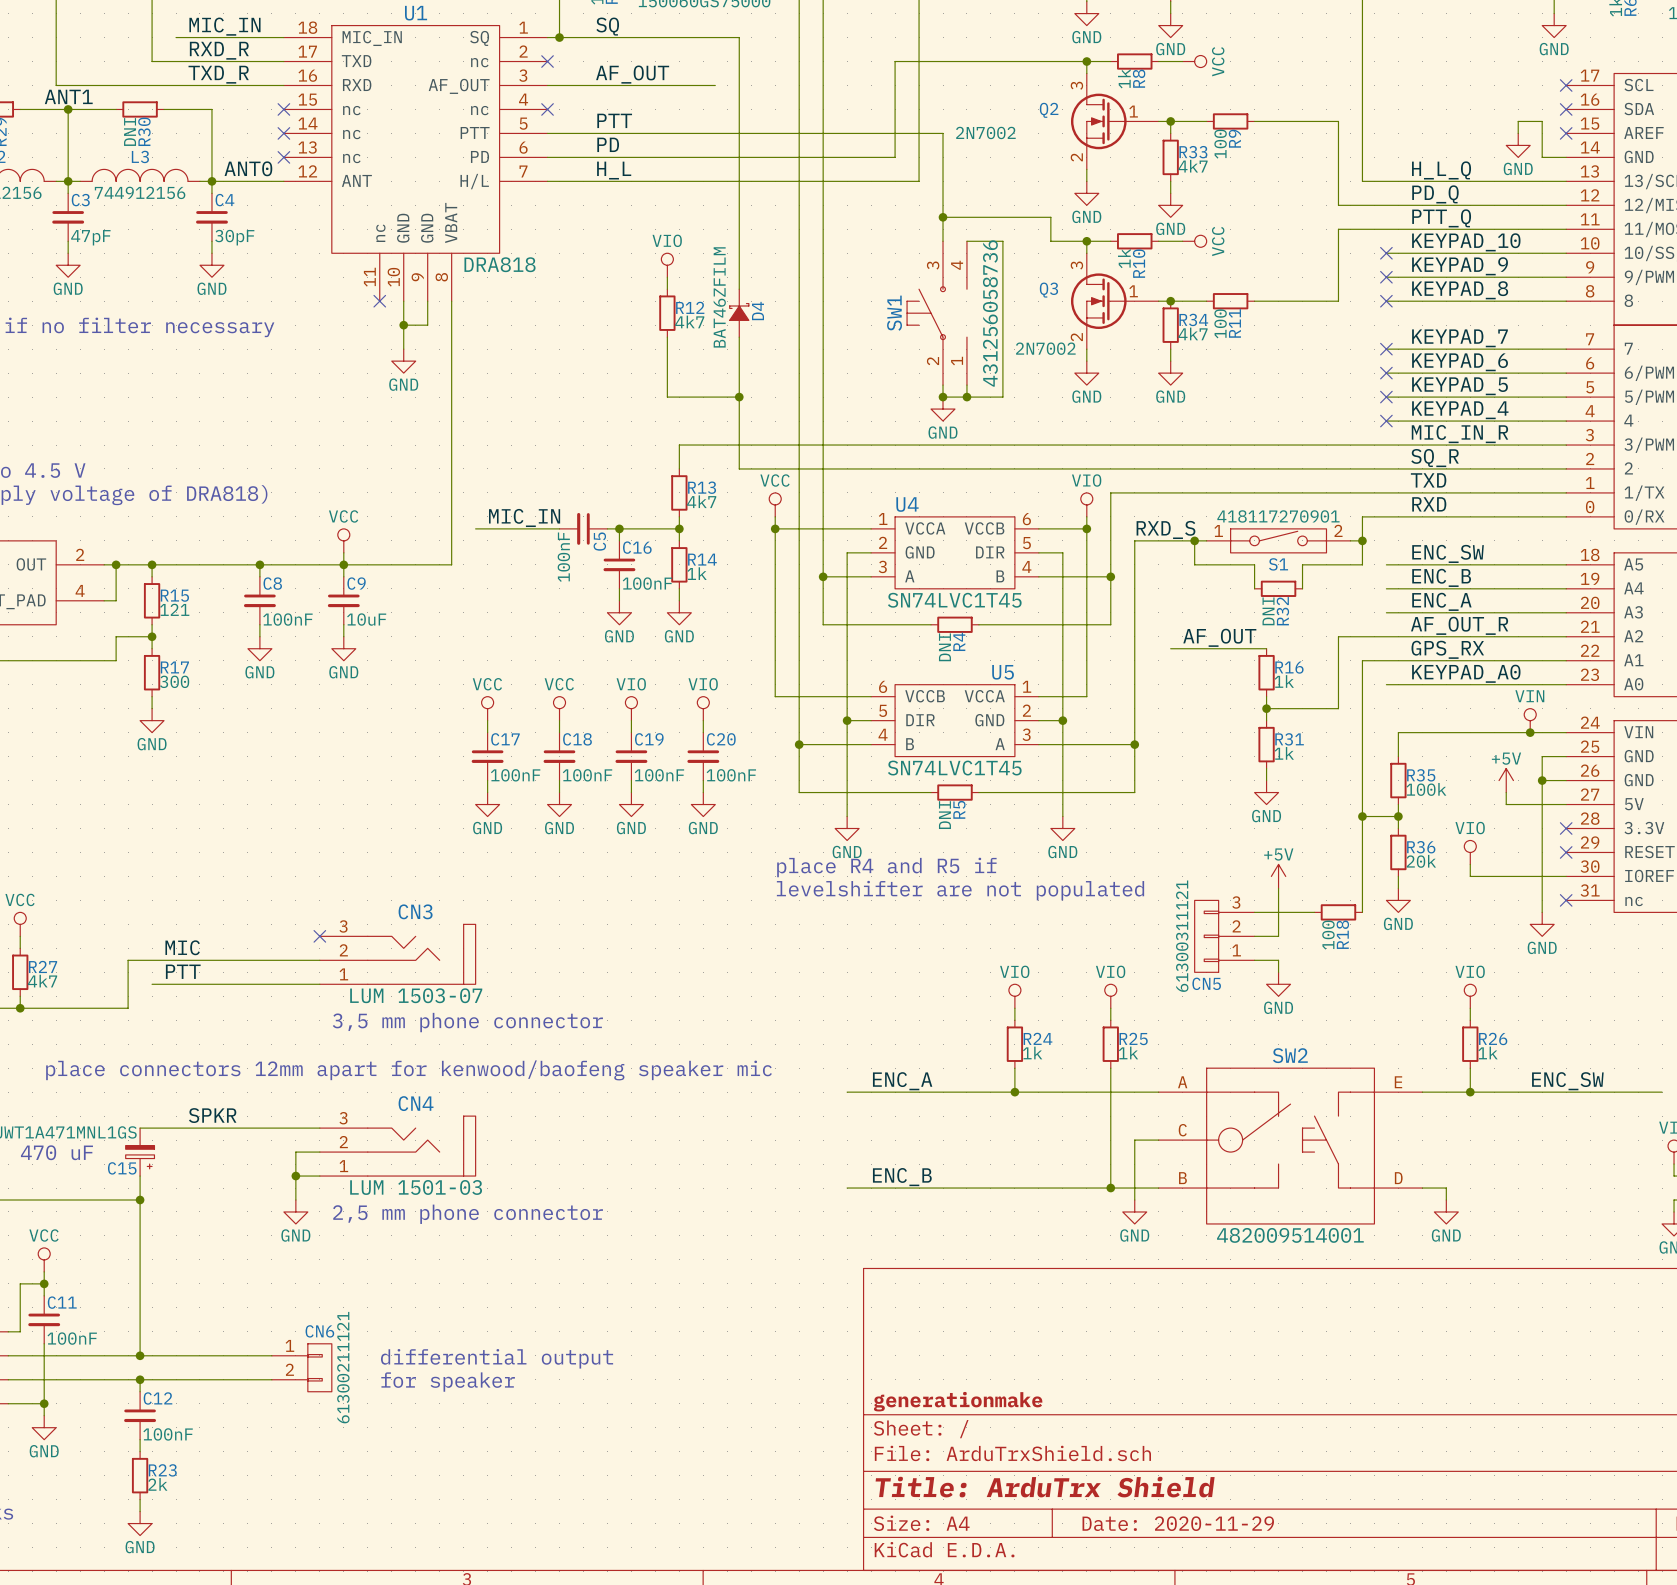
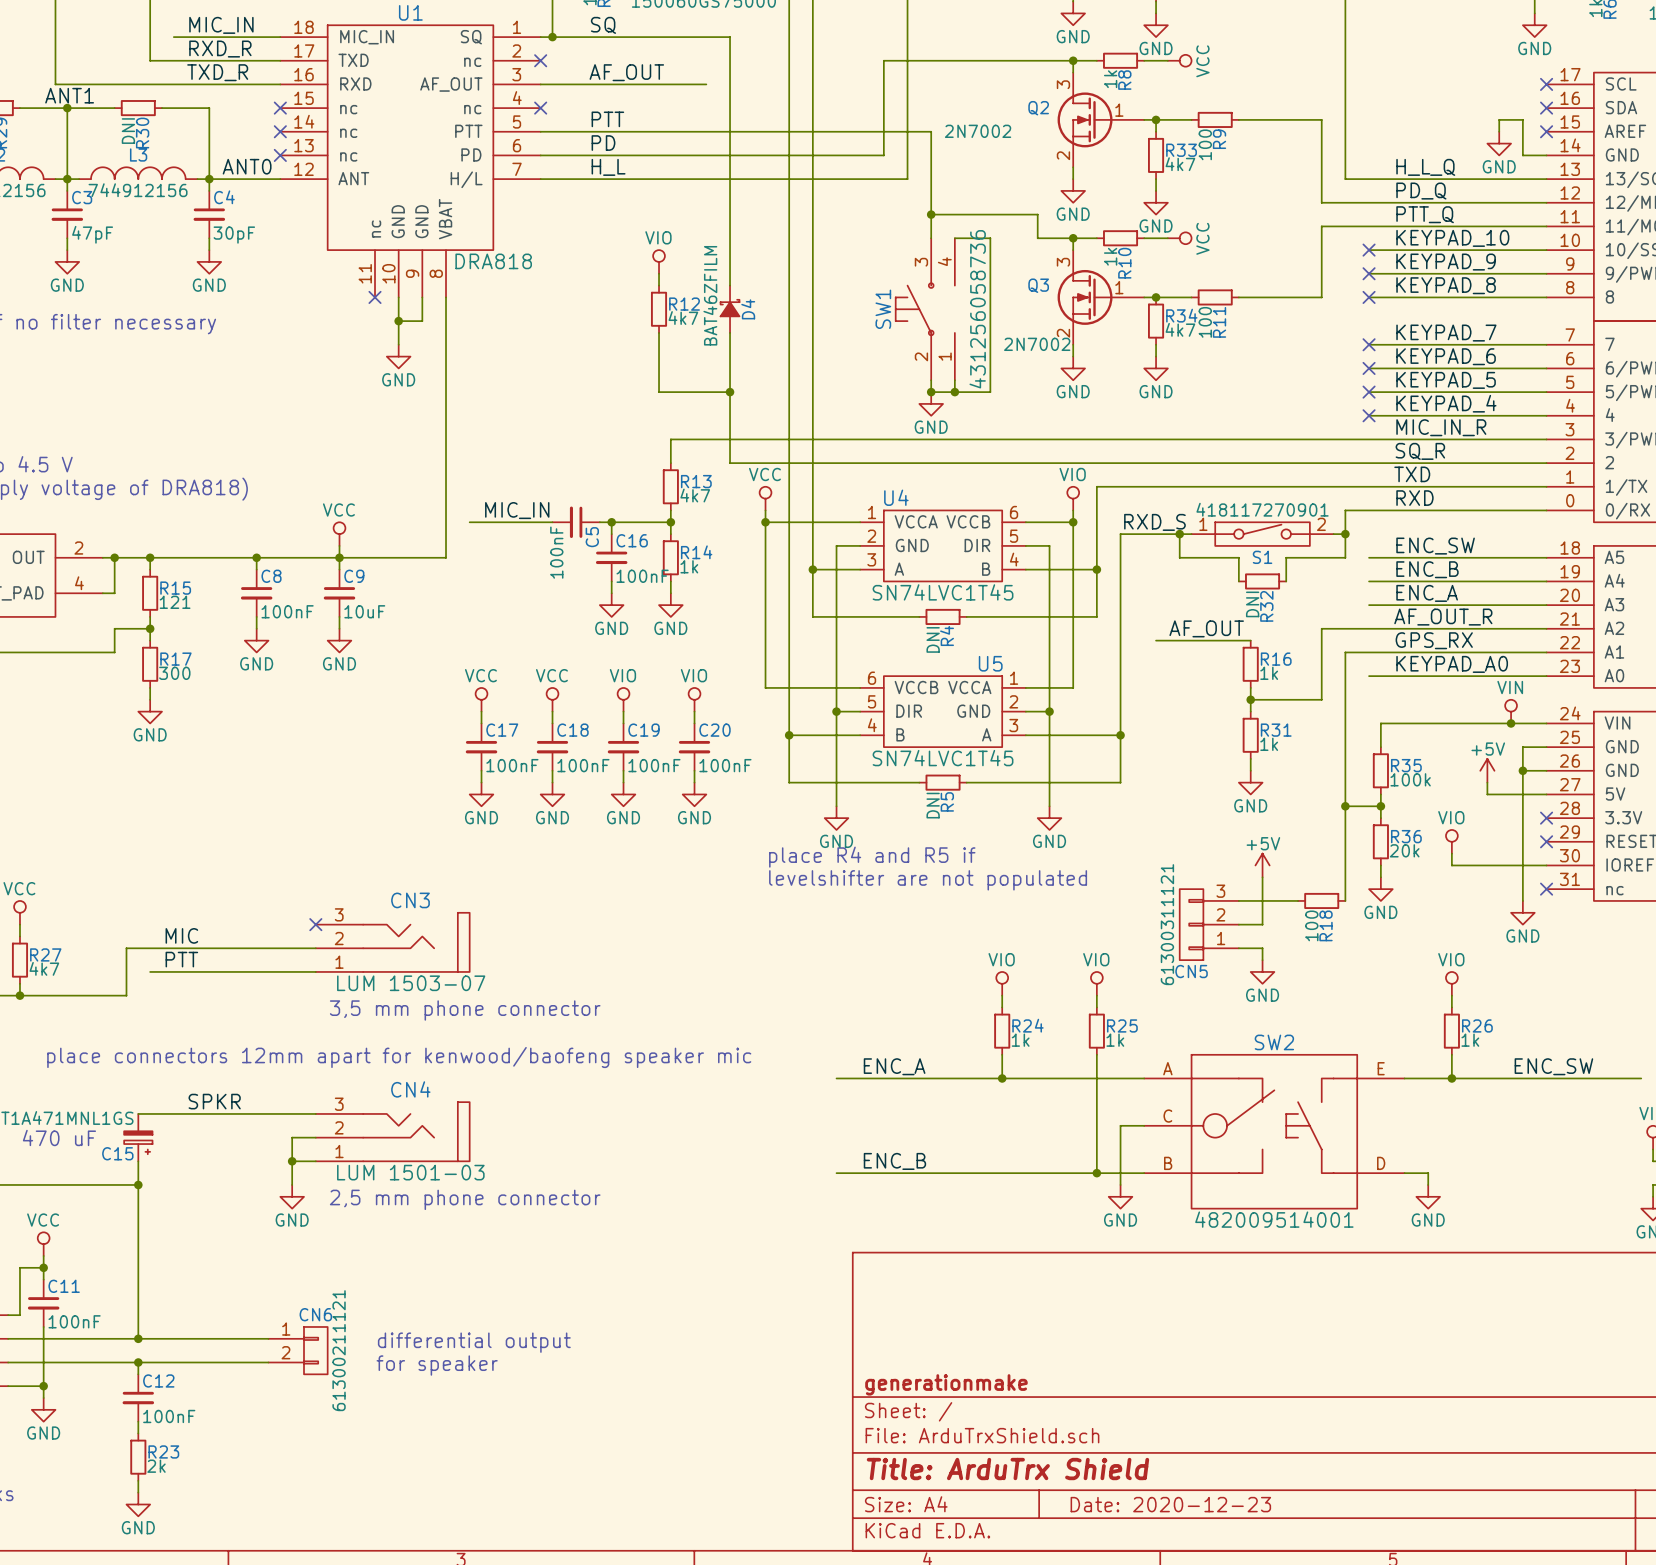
title block: Date: 2020-11-29 (1178, 1523) -> Date: 2020-12-23 (1170, 1504)

